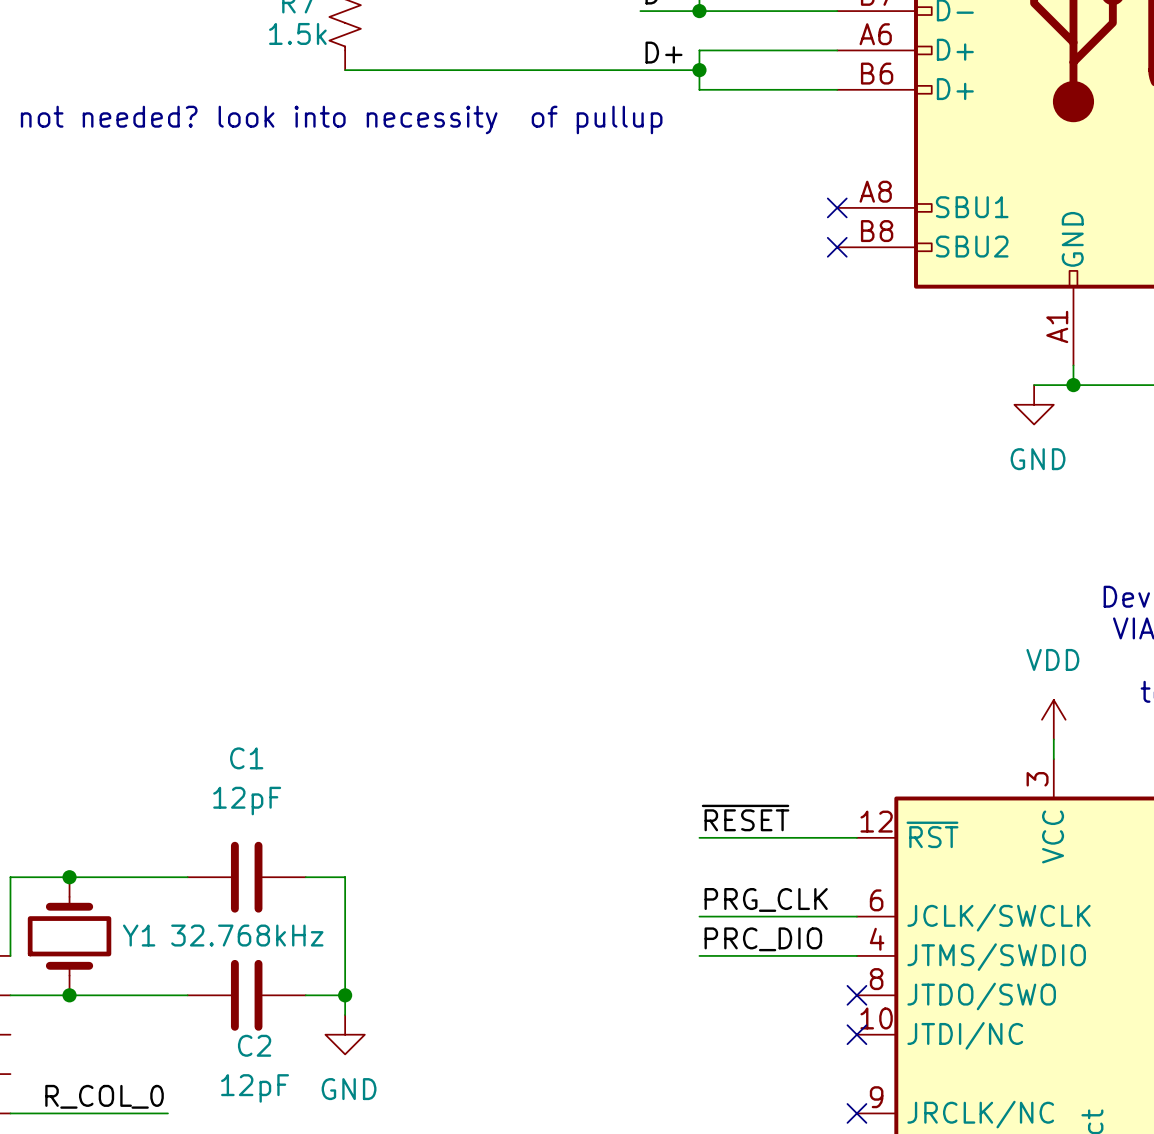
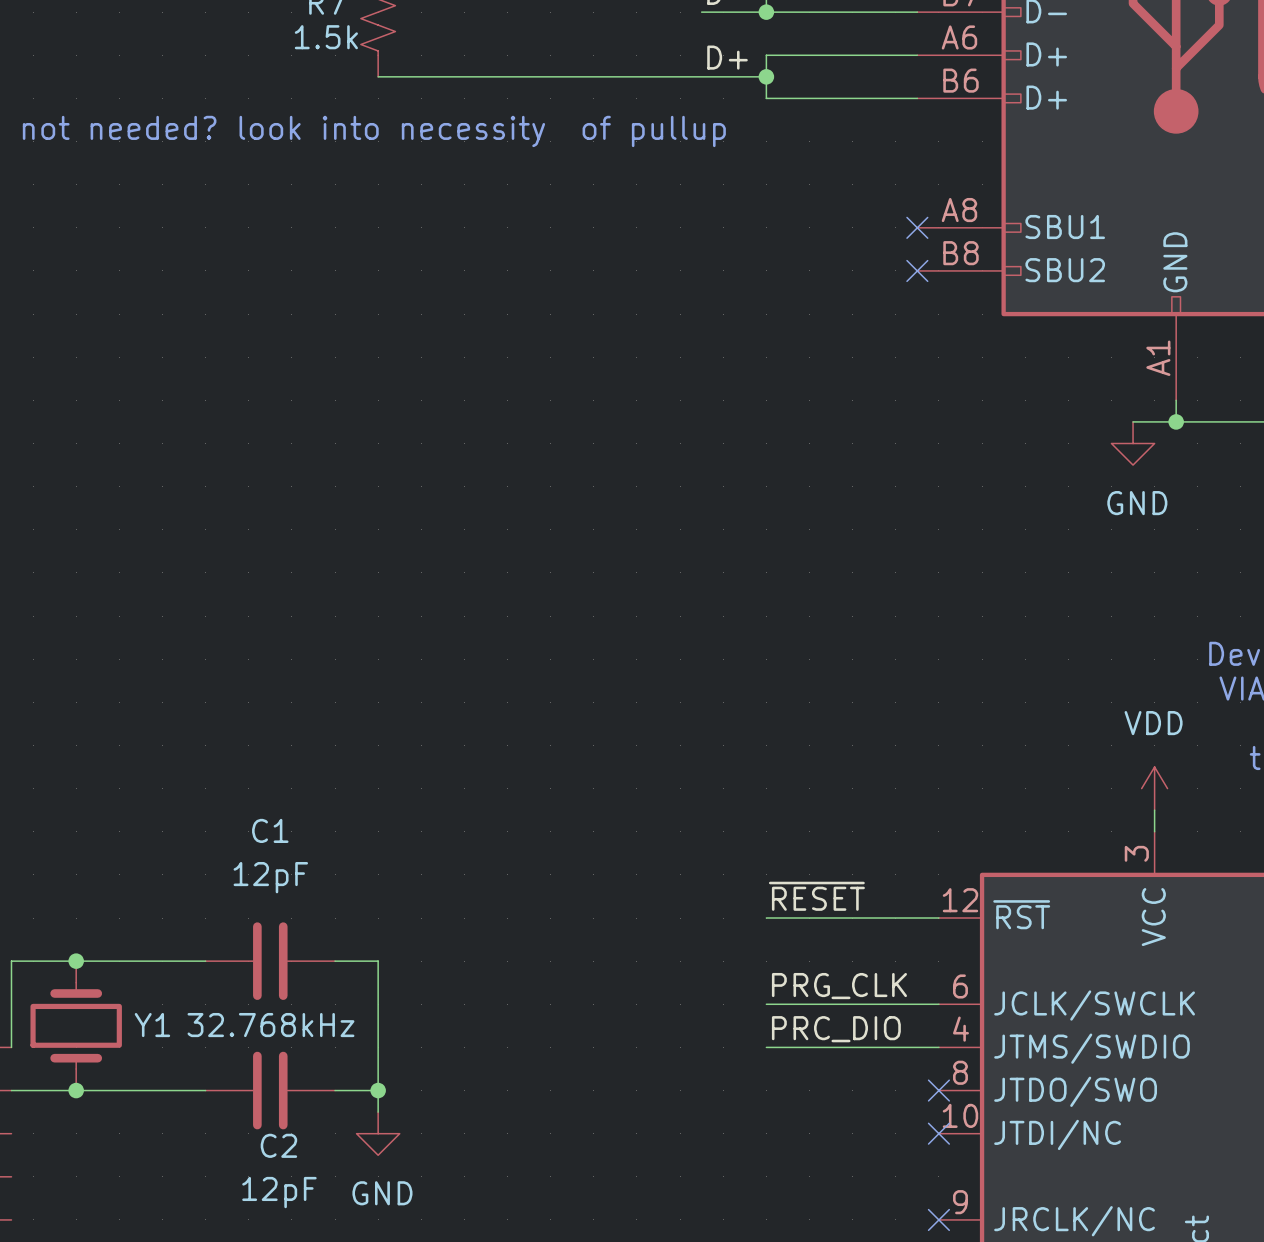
label: R_COL_0 (104, 1096) -> none
wire: (10, 1113) (167, 1113) -> none

